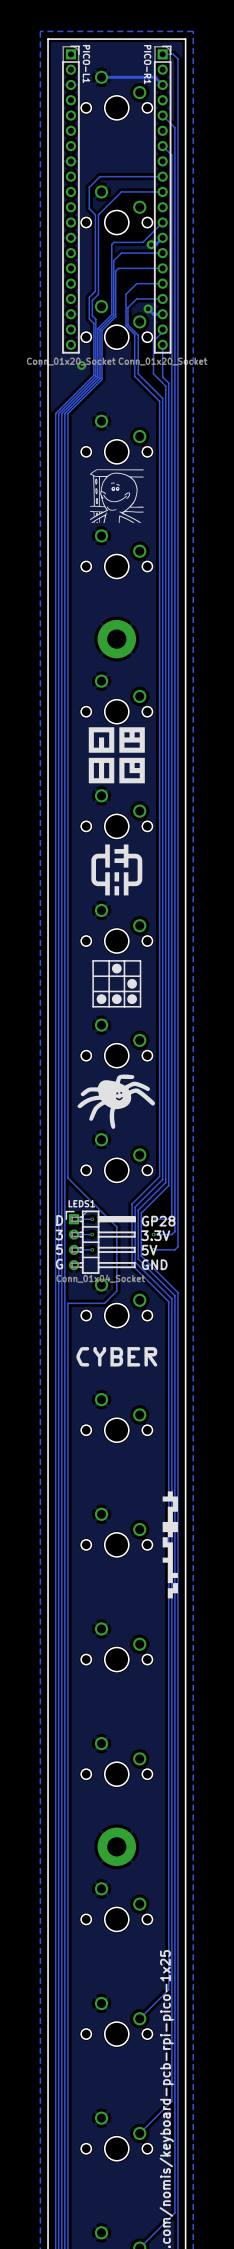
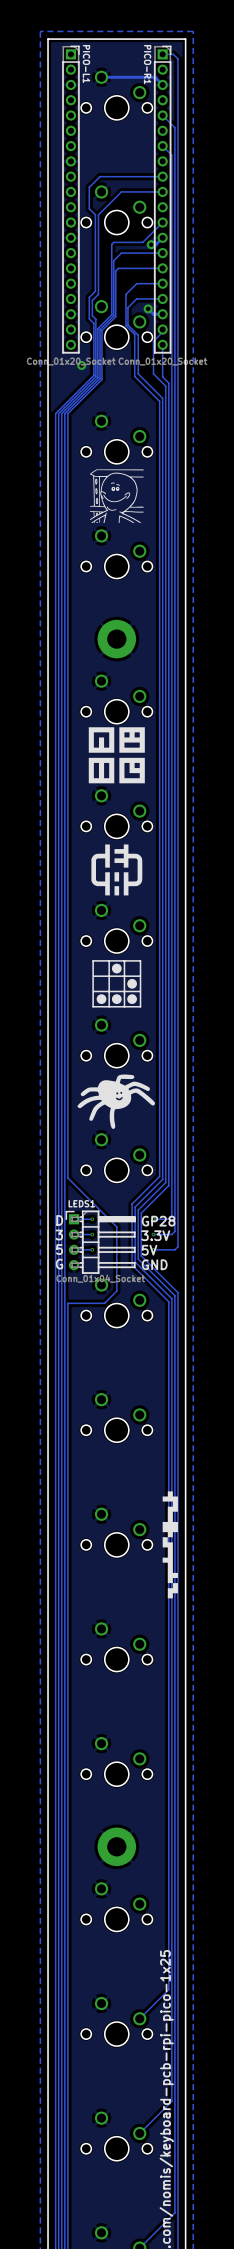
drawing: [76, 1347, 158, 1367] -> none

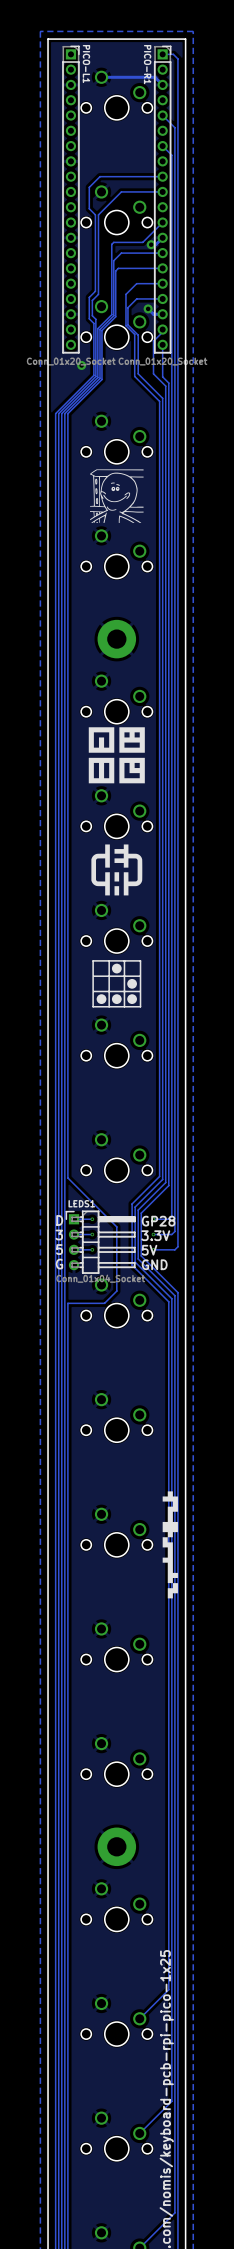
drawing: [77, 1074, 155, 1130] -> none

